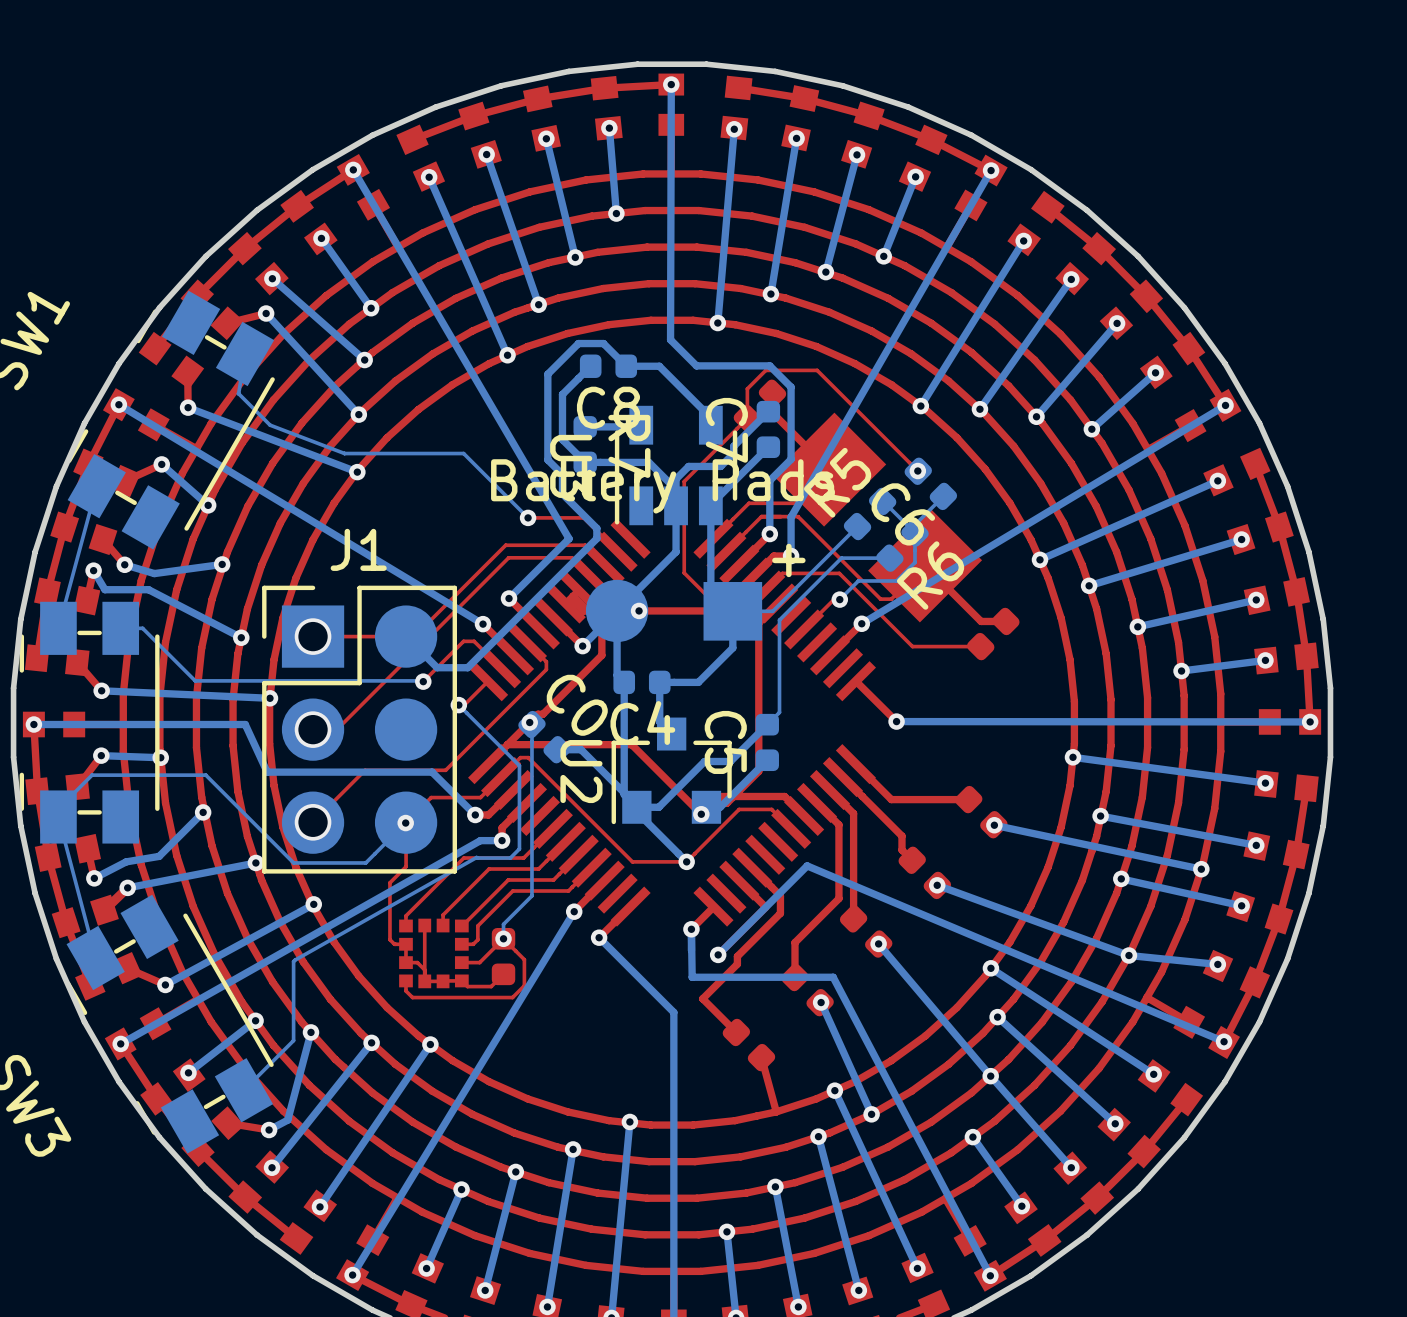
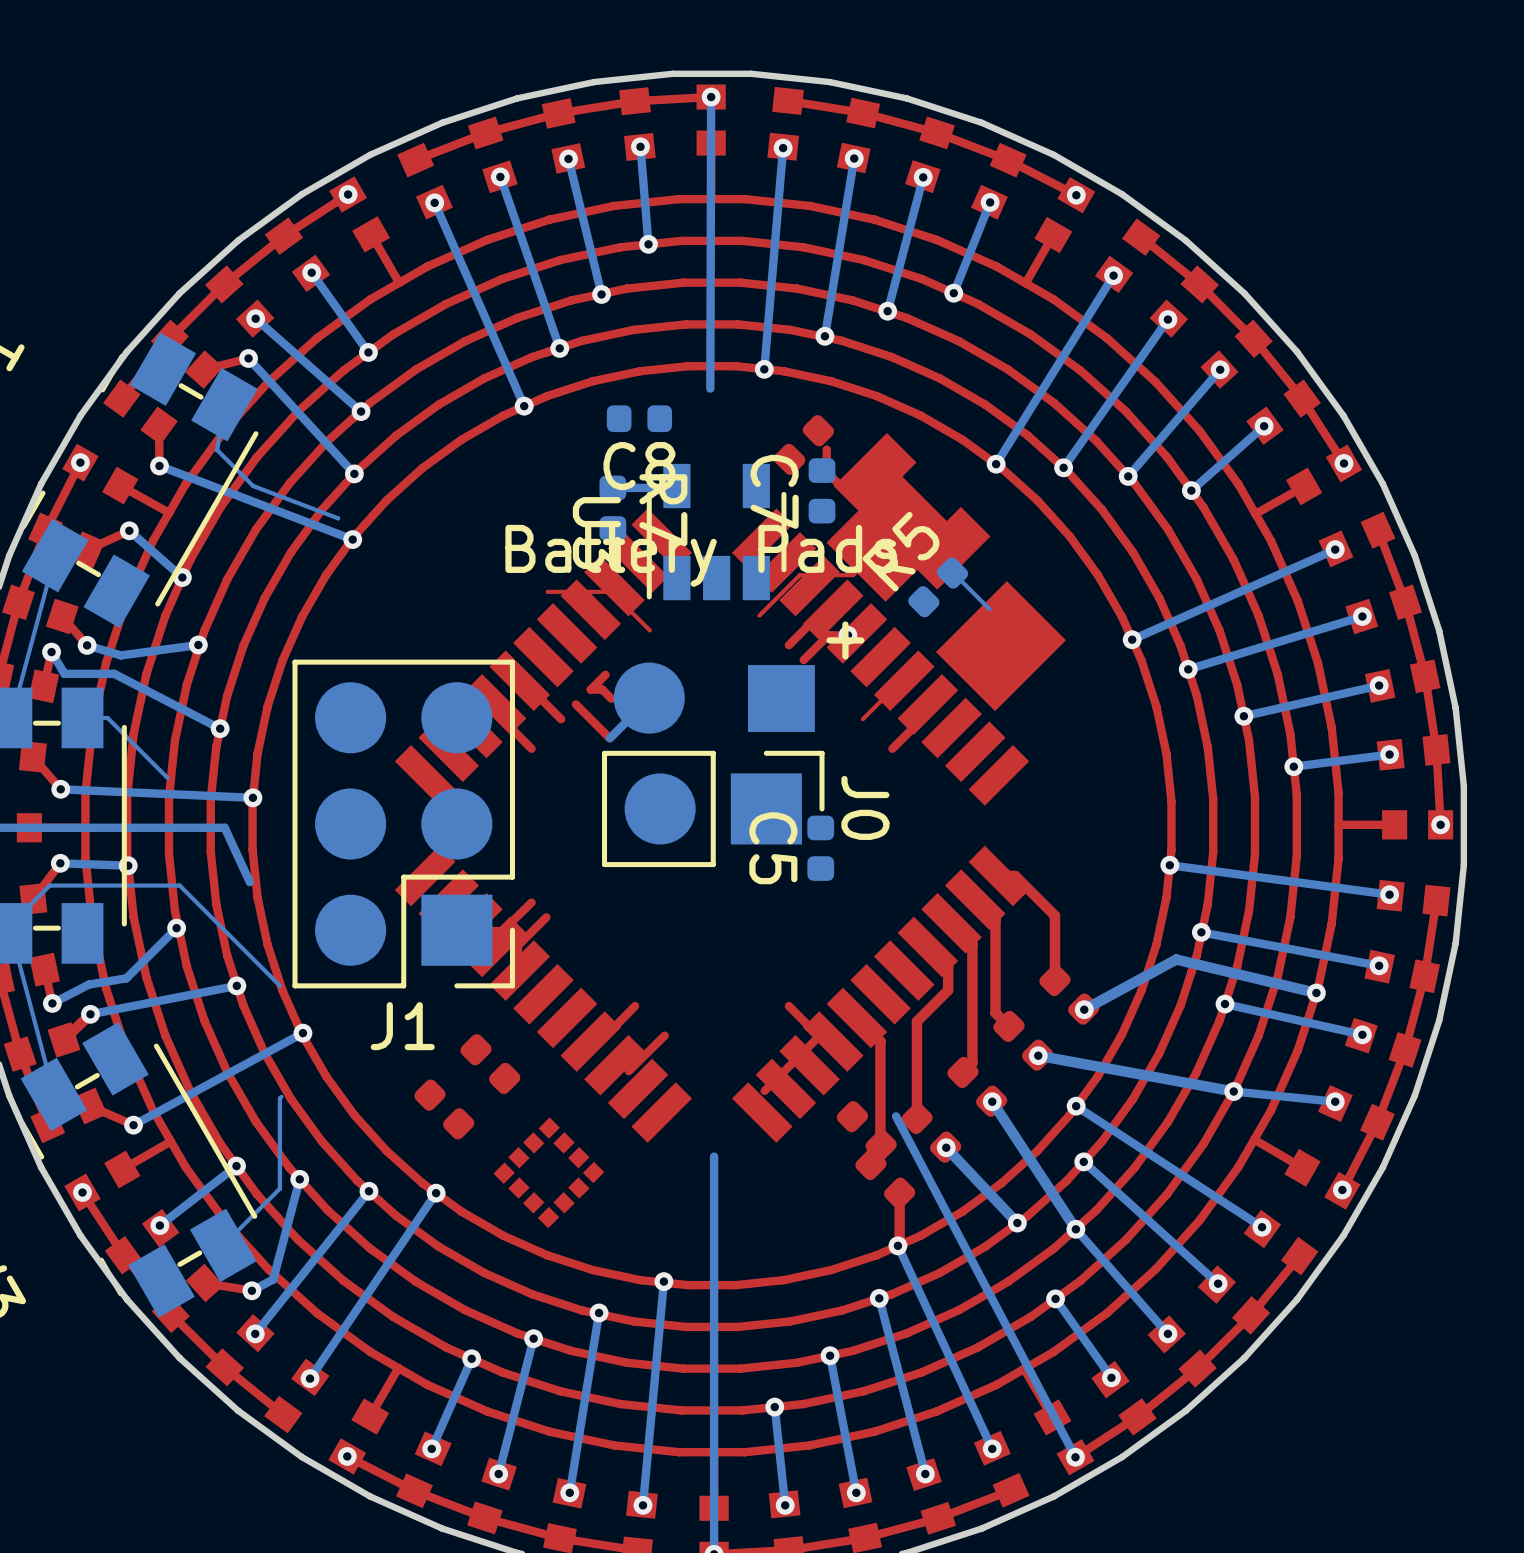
bottom track: (353, 169) (569, 538) (509, 598) -> none
bottom track: (991, 170) (791, 517) (791, 556) -> none
bottom track: (670, 339) (696, 365) (769, 365) (791, 387) (791, 459) (769, 480) (769, 534) -> none
bottom track: (590, 366) (562, 394) (562, 439) (585, 462) (648, 462) (676, 489) -> none
bottom track: (118, 404) (483, 624) -> none
part position: (759, 405) -> (804, 445)
bottom track: (1225, 405) (861, 623) -> none
bottom track: (768, 411) (733, 446) (733, 453) (720, 466) (688, 466) (676, 479) (676, 551) (617, 610) (617, 675) (624, 682) (624, 794) (636, 807) (658, 807) (704, 761) (730, 761) (779, 712) (779, 620) (841, 558) (889, 558) -> none
bottom track: (710, 425) (710, 417) (659, 366) (626, 366) (603, 343) (578, 343) (547, 374) (547, 459) (562, 474) (562, 494) (596, 528) (596, 538) (467, 667) (437, 667) (406, 636) -> none
bottom track: (768, 447) (710, 504) (710, 589) (732, 611) -> none
part: none -> (912, 511)
bottom track: (344, 453) (463, 453) (528, 517) -> none
top track: (917, 471) (817, 370) (765, 370) (747, 388) (747, 418) (684, 481) (684, 572) (721, 610) (745, 610) (782, 573) (839, 573) (912, 646) (980, 646) -> none
via: (917, 471) -> none
C6: (930, 483) -> none
bottom track: (943, 496) (914, 524) (914, 562) (896, 580) (858, 580) (839, 599) -> none
via: (528, 517) -> none
part footprint: [468, 518, 877, 927] -> [394, 508, 1030, 1143]
bottom track: (857, 526) (772, 611) (732, 611) -> none
via: (769, 534) -> none
R6: (902, 545) -> none
top track: (726, 551) (761, 516) (798, 516) (880, 599) (891, 599) (925, 565) (981, 621) (1005, 621) -> none
top track: (604, 564) (585, 545) (505, 545) (414, 636) (313, 636) -> none
top track: (591, 577) (571, 557) (508, 557) (336, 730) (313, 730) -> none
top track: (765, 590) (744, 610) (639, 610) -> none
top track: (573, 596) (601, 625) (601, 655) (542, 714) (537, 714) (488, 764) -> none
via: (509, 598) -> none
via: (839, 599) -> none
top track: (778, 603) (758, 622) (758, 771) (726, 803) (712, 803) -> none
via: (639, 610) -> none
bottom track: (732, 611) (732, 647) (698, 682) (659, 682) (659, 722) (671, 734) -> none
via: (861, 623) -> none
via: (483, 624) -> none
part: (993, 634) -> none
via: (313, 636) -> none
top track: (526, 642) (546, 661) (546, 669) (445, 770) (365, 770) (313, 822) -> none
via: (582, 646) -> none
top track: (501, 668) (474, 641) (463, 641) (423, 681) -> none
bottom track: (420, 680) (195, 680) -> none
via: (423, 681) -> none
top track: (488, 681) (464, 705) (458, 705) -> none
top track: (855, 681) (896, 721) -> none
C4: (641, 682) -> none
bottom track: (458, 705) (519, 765) (519, 848) (510, 858) (476, 857) (294, 960) -> none
via: (458, 705) -> none
J0: none -> (713, 808)
bottom track: (896, 721) (1310, 721) -> none
via: (896, 721) -> none
via: (529, 722) -> none
bottom track: (531, 724) (531, 895) (503, 924) (503, 938) -> none
via: (313, 729) -> none
J1 rotation: 0° (359, 729) -> 180° (403, 824)
C0 side: bottom (544, 737) -> top (490, 1064)
top track: (507, 744) (631, 744) (701, 814) (719, 796) (784, 796) (804, 815) -> none
bottom track: (557, 749) (581, 749) (636, 805) (636, 812) (686, 861) -> none
bottom track: (767, 760) (720, 807) (706, 807) -> none
top track: (855, 764) (891, 799) (968, 799) -> none
top track: none -> (998, 875) (1015, 875) (1054, 915) (1054, 980)
U2: (671, 770) -> none
bottom track: (267, 772) (432, 772) (475, 814) -> none
top track: (842, 777) (901, 836) (901, 850) (912, 860) -> none
top track: none -> (975, 899) (995, 919) (995, 1012) (1008, 1026)
top track: (830, 790) (853, 813) (853, 918) -> none
top track: (817, 802) (838, 824) (838, 898) (794, 942) (794, 977) -> none
top track: none -> (951, 923) (972, 944) (972, 1062) (962, 1072)
part: (981, 812) -> none
via: (475, 814) -> none
via: (701, 814) -> none
via: (313, 822) -> none
bottom track: (406, 822) (365, 862) (293, 862) -> none
via: (405, 823) -> none
bottom track: (994, 825) (1201, 869) -> (1084, 1009) (1176, 959) (1316, 992)
via: (994, 825) -> none
top track: (552, 828) (523, 858) (463, 858) (405, 915) (405, 925) -> none
top track: (791, 828) (771, 809) (739, 809) (686, 861) (632, 861) (528, 757) (520, 757) (480, 797) (431, 797) (406, 822) (406, 866) (389, 882) (389, 939) (394, 944) (405, 944) (405, 962) (417, 962) (424, 969) -> none
top track: none -> (927, 946) (948, 967) (948, 990) (916, 1021) (916, 1118)
bottom track: (502, 840) (480, 840) (120, 1043) -> none
via: (502, 840) -> none
top track: (565, 841) (538, 869) (489, 869) (443, 914) (443, 925) -> none
top track: (578, 854) (553, 880) (508, 880) (462, 925) -> none
via: (686, 861) -> none
top track: (591, 867) (568, 891) (512, 891) (477, 925) (477, 939) (473, 944) (461, 944) -> none
top track: (752, 867) (780, 895) (780, 913) (737, 956) (737, 964) (702, 998) (736, 1032) -> none
part: none -> (1069, 994)
part: (924, 872) -> none
via: none -> (1084, 1009)
bottom track: (937, 885) (1128, 955) -> (1038, 1055) (1233, 1091)
via: (937, 885) -> none
top track: none -> (856, 1017) (880, 1041) (880, 1155) (870, 1164)
top track: (713, 907) (691, 929) -> none
bottom track: (574, 911) (352, 1275) -> none
via: (574, 911) -> none
part: none -> (1023, 1040)
part footprint: [399, 918, 469, 989] -> [414, 1079, 475, 1140]
via: none -> (1038, 1055)
top track: (424, 925) (424, 981) (443, 981) -> none
via: (691, 929) -> none
part: (866, 931) -> none
bottom track: (599, 937) (673, 1012) -> none
via: (599, 937) -> none
via: (503, 938) -> none
bottom track: (878, 943) (990, 1076) -> (992, 1101) (1075, 1229)
via: (878, 943) -> none
bottom track: (691, 950) (691, 929) (692, 977) (833, 977) -> none
part: none -> (977, 1086)
bottom track: (718, 954) (807, 865) (1224, 1041) -> none
via: (718, 954) -> none
part: (503, 956) -> none
top track: (461, 962) (479, 962) (503, 938) (524, 959) (524, 985) (512, 997) (412, 997) (405, 991) (405, 980) -> none
via: none -> (992, 1101)
top track: (503, 974) (491, 986) (467, 986) (461, 980) (443, 980) -> none
part: none -> (931, 1132)
bottom track: (821, 1002) (871, 1114) -> none
via: (821, 1002) -> none
bottom track: none -> (946, 1147) (1017, 1223)
via: none -> (946, 1147)
part: none -> (548, 1172)
part: none -> (885, 1178)
top track: none -> (899, 1193) (899, 1244) (897, 1245)
part: (748, 1045) -> none
top track: (761, 1057) (776, 1111) -> none
via: none -> (1017, 1223)
via: (871, 1114) -> none

